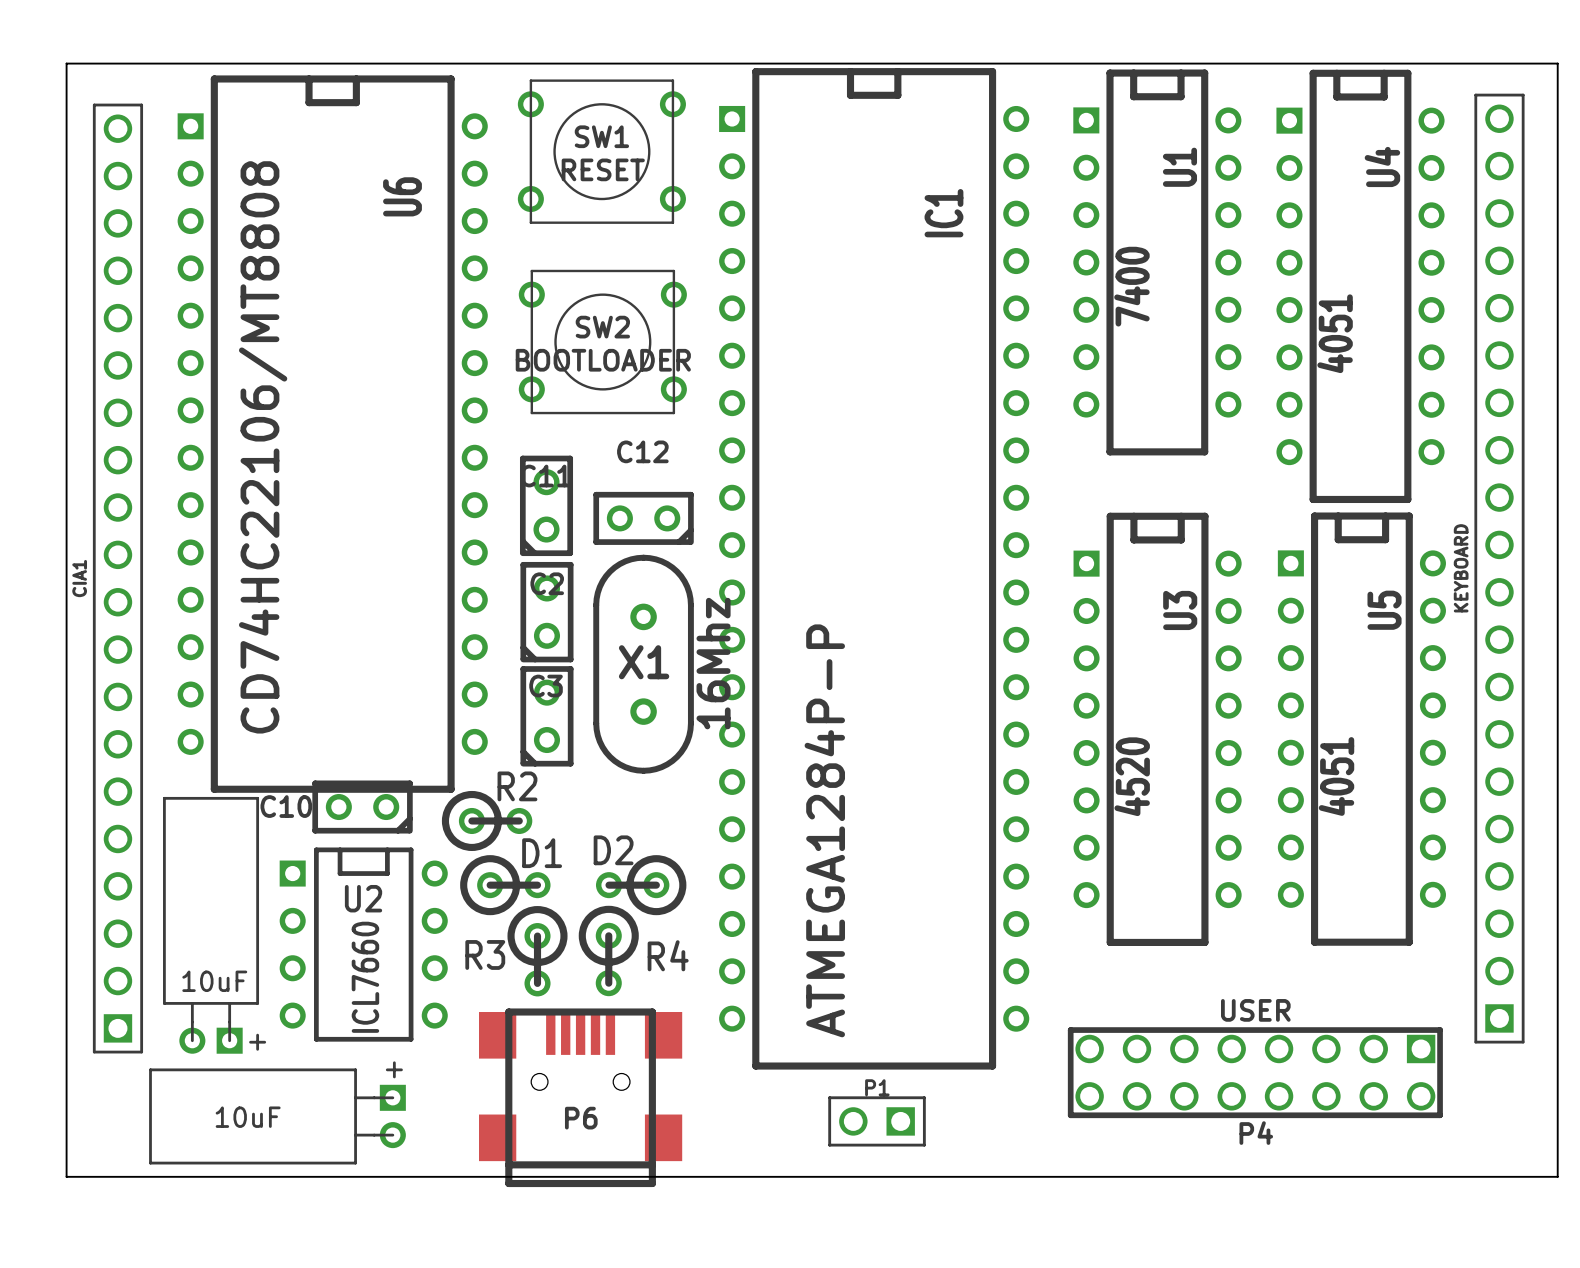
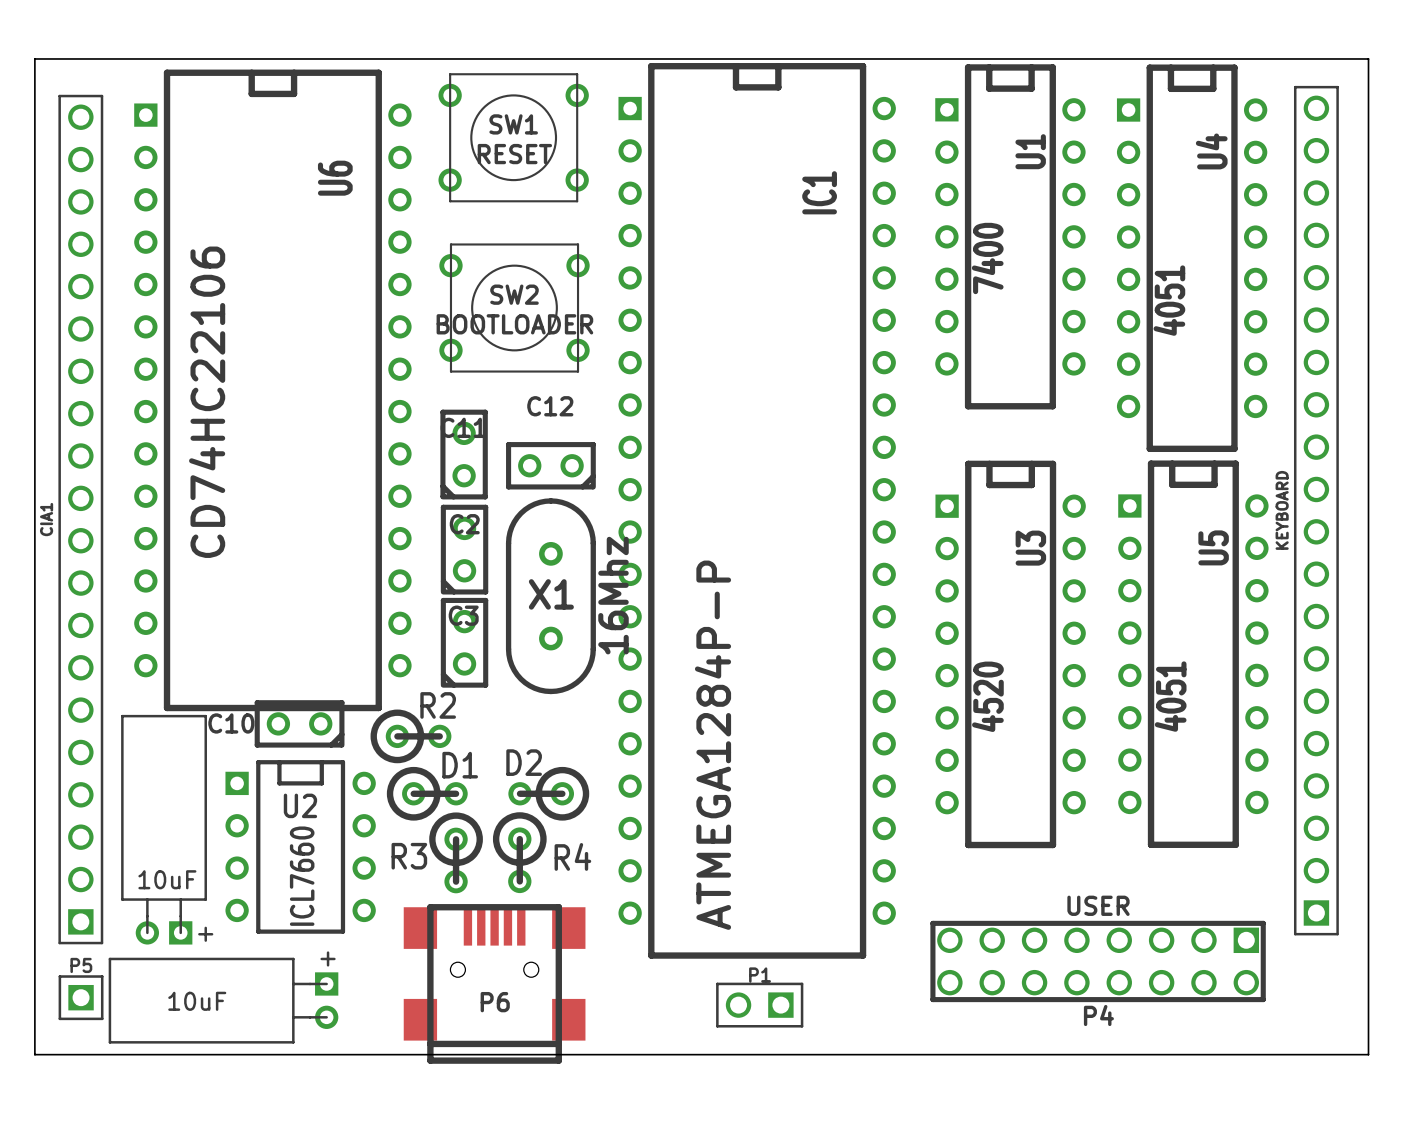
U6 value: CD74HC22106/MT8808 (263, 447) -> CD74HC22106 (207, 402)
P5: none -> (81, 997)

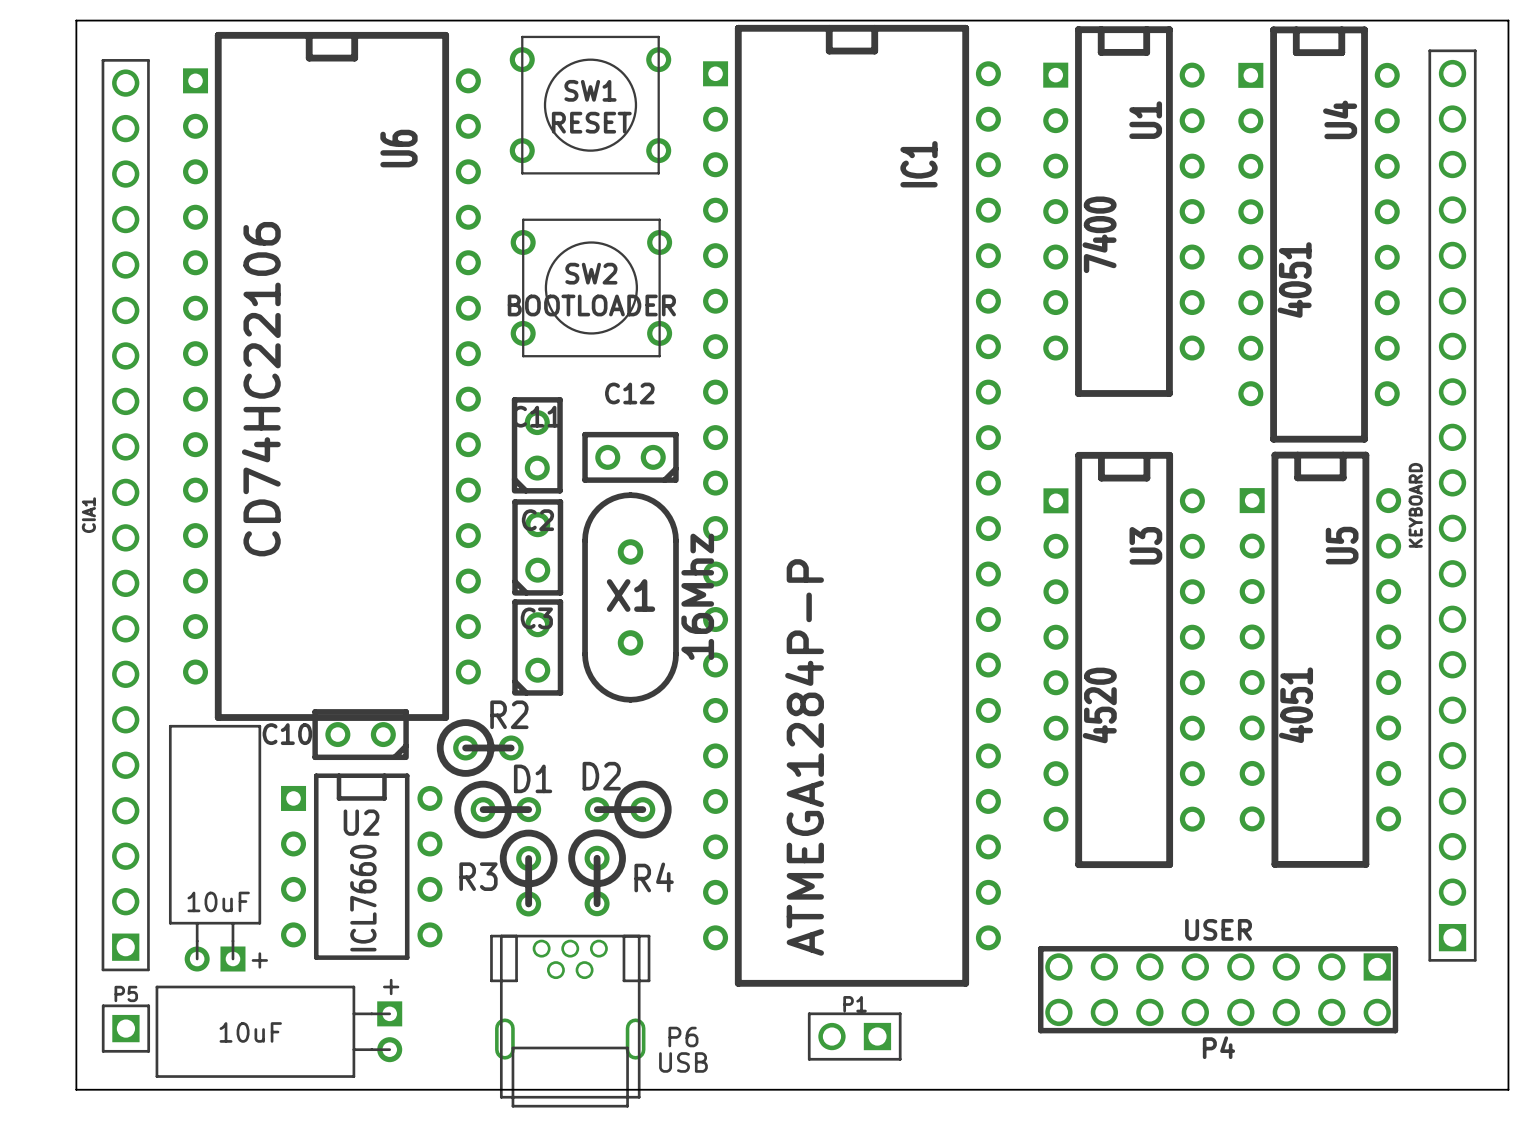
P6 footprint: [403, 904, 586, 1064] -> [490, 934, 651, 1108]
P6 name position: P6 (495, 1002) -> P6 (683, 1037)
P6 value: none -> USB (683, 1062)

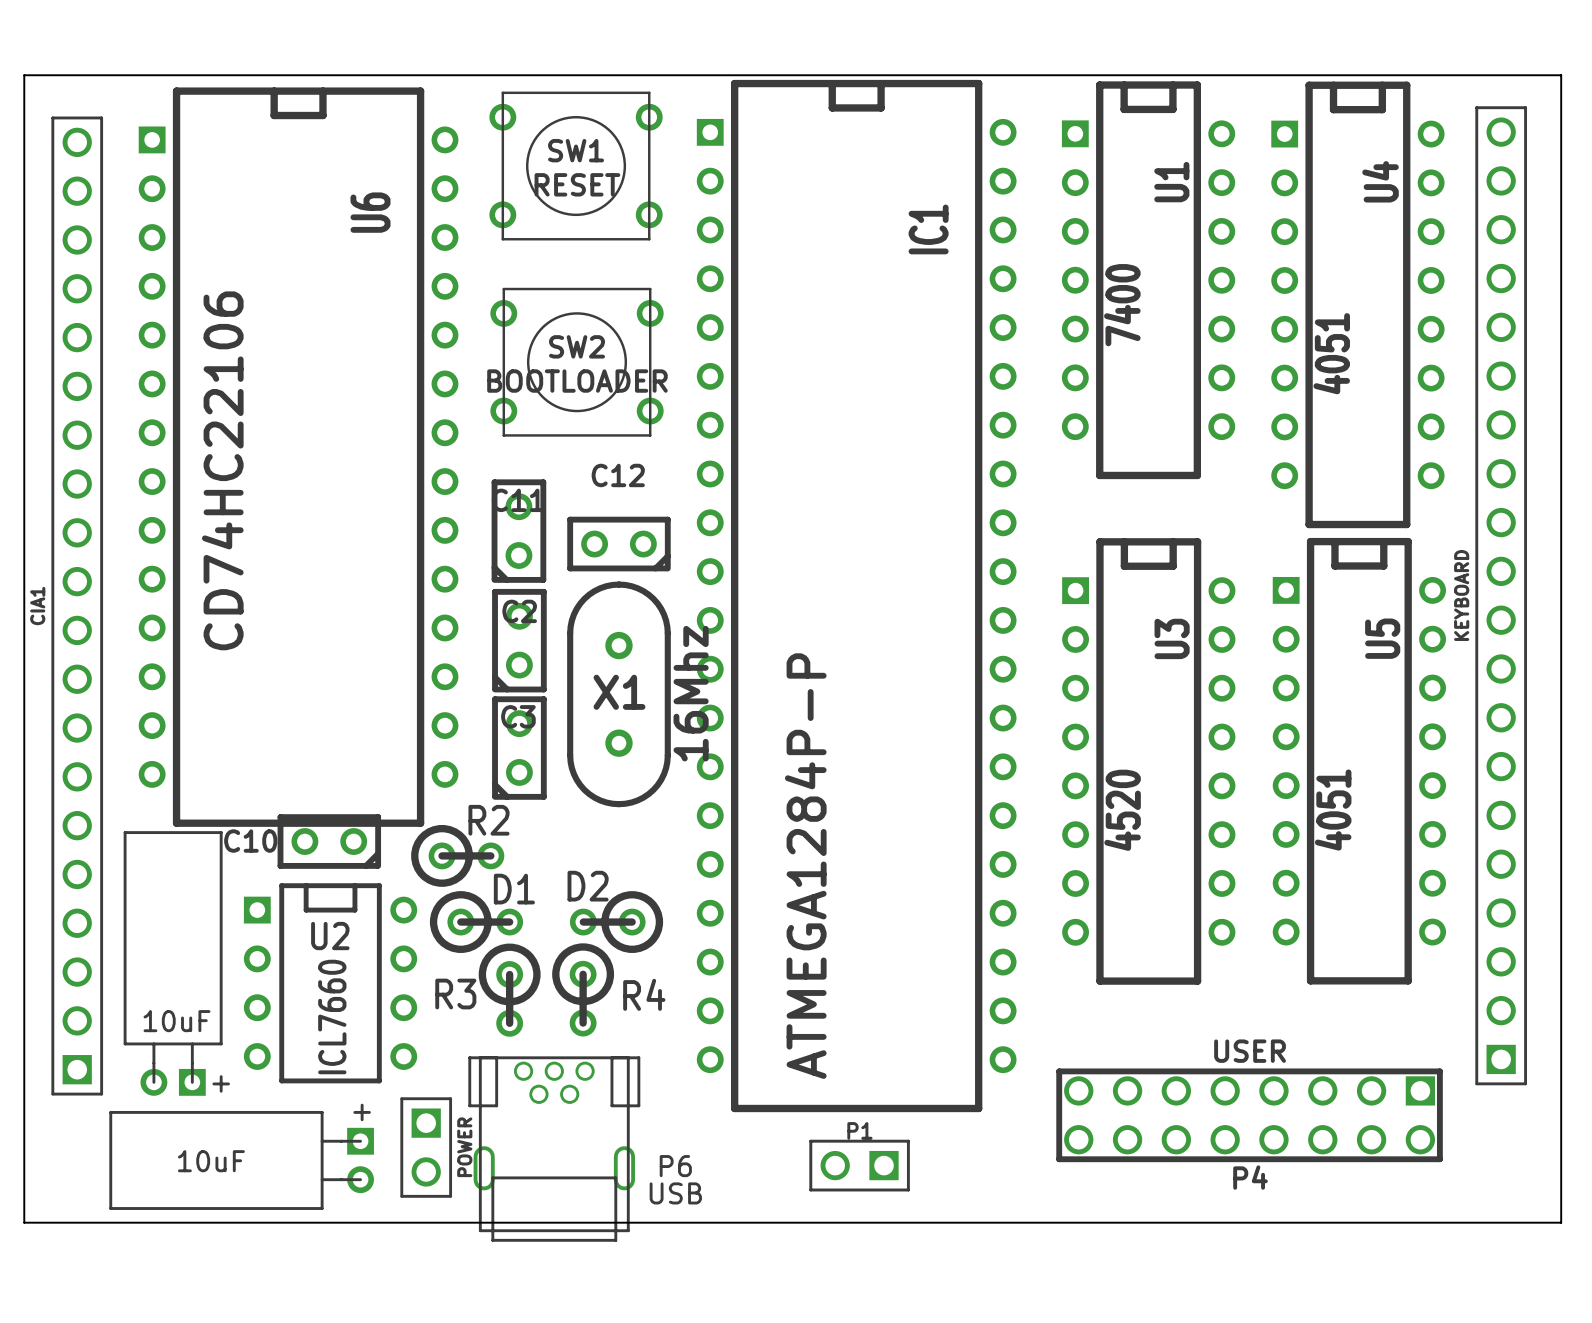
part: none -> POWER (426, 1147)
P5: (125, 1028) -> none

